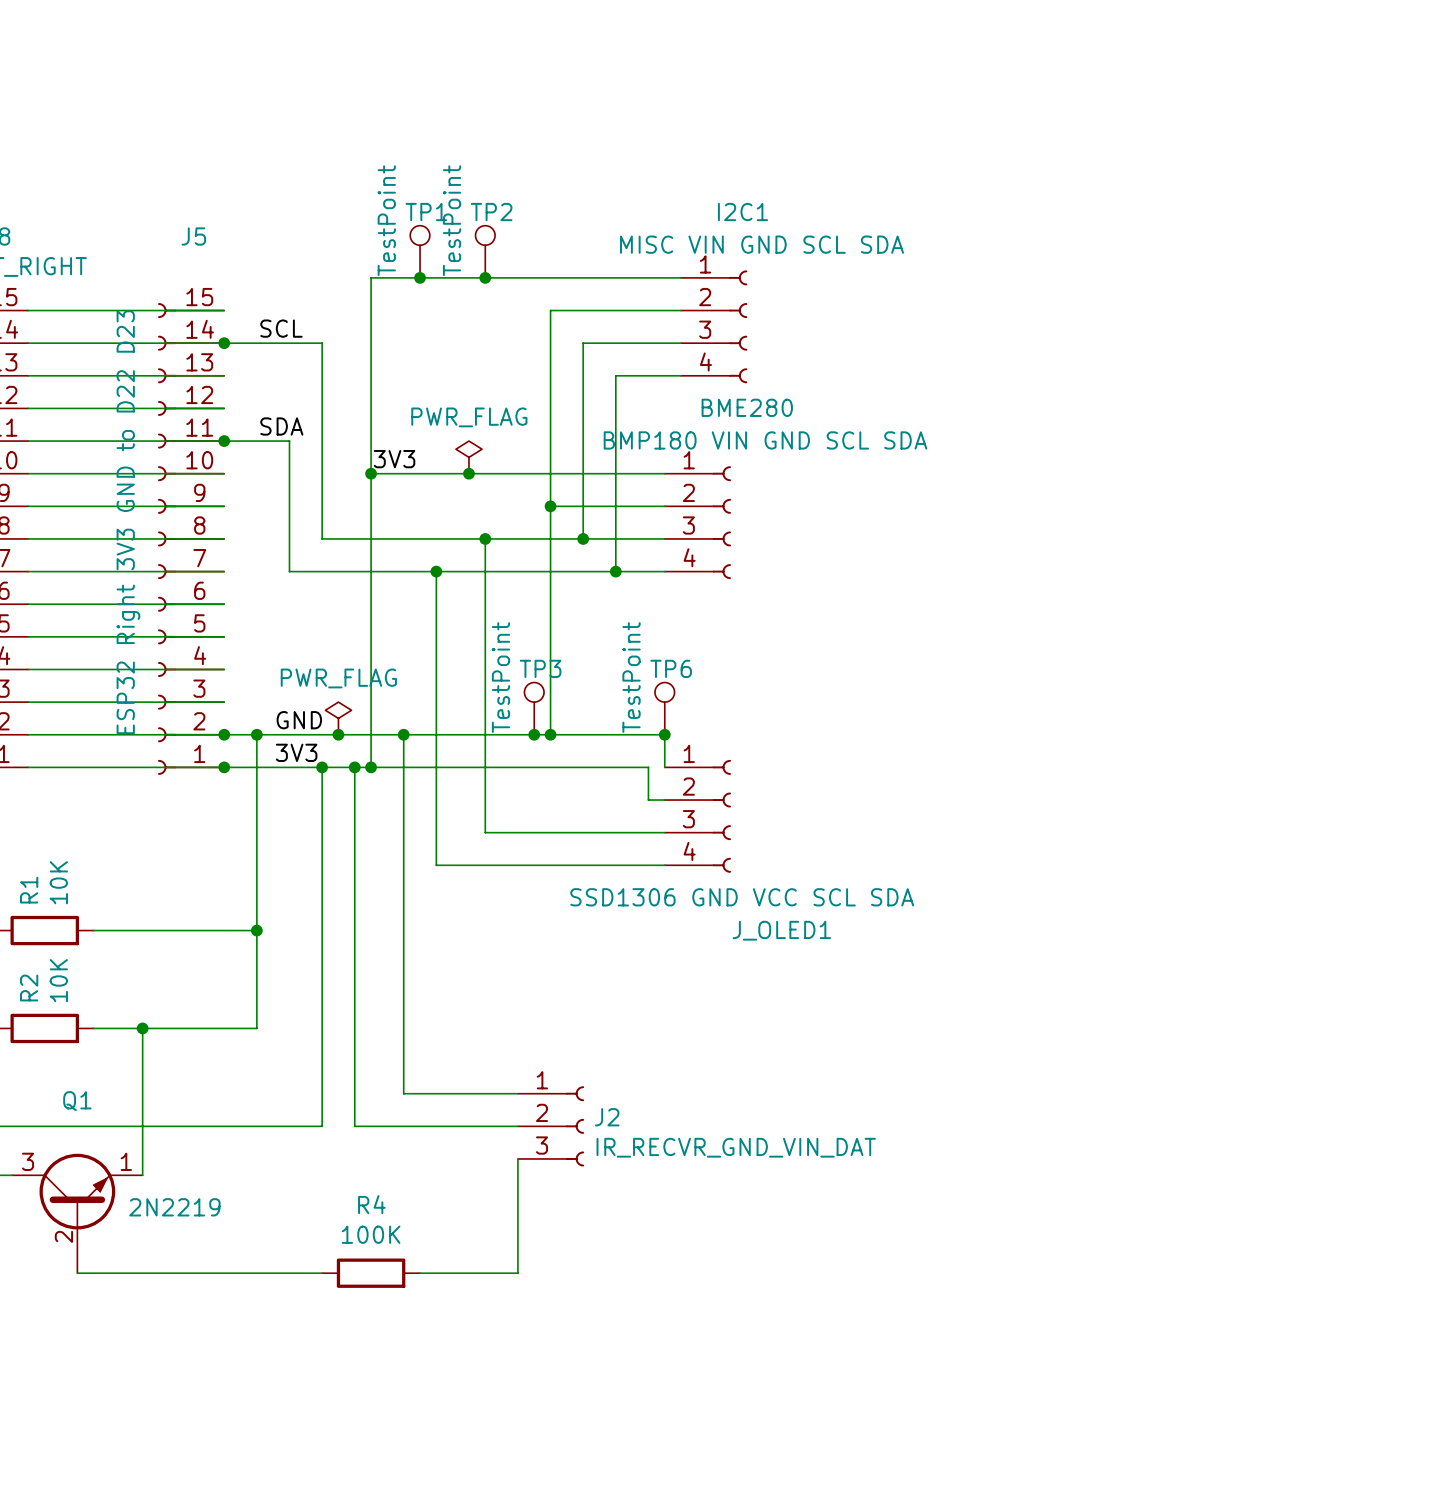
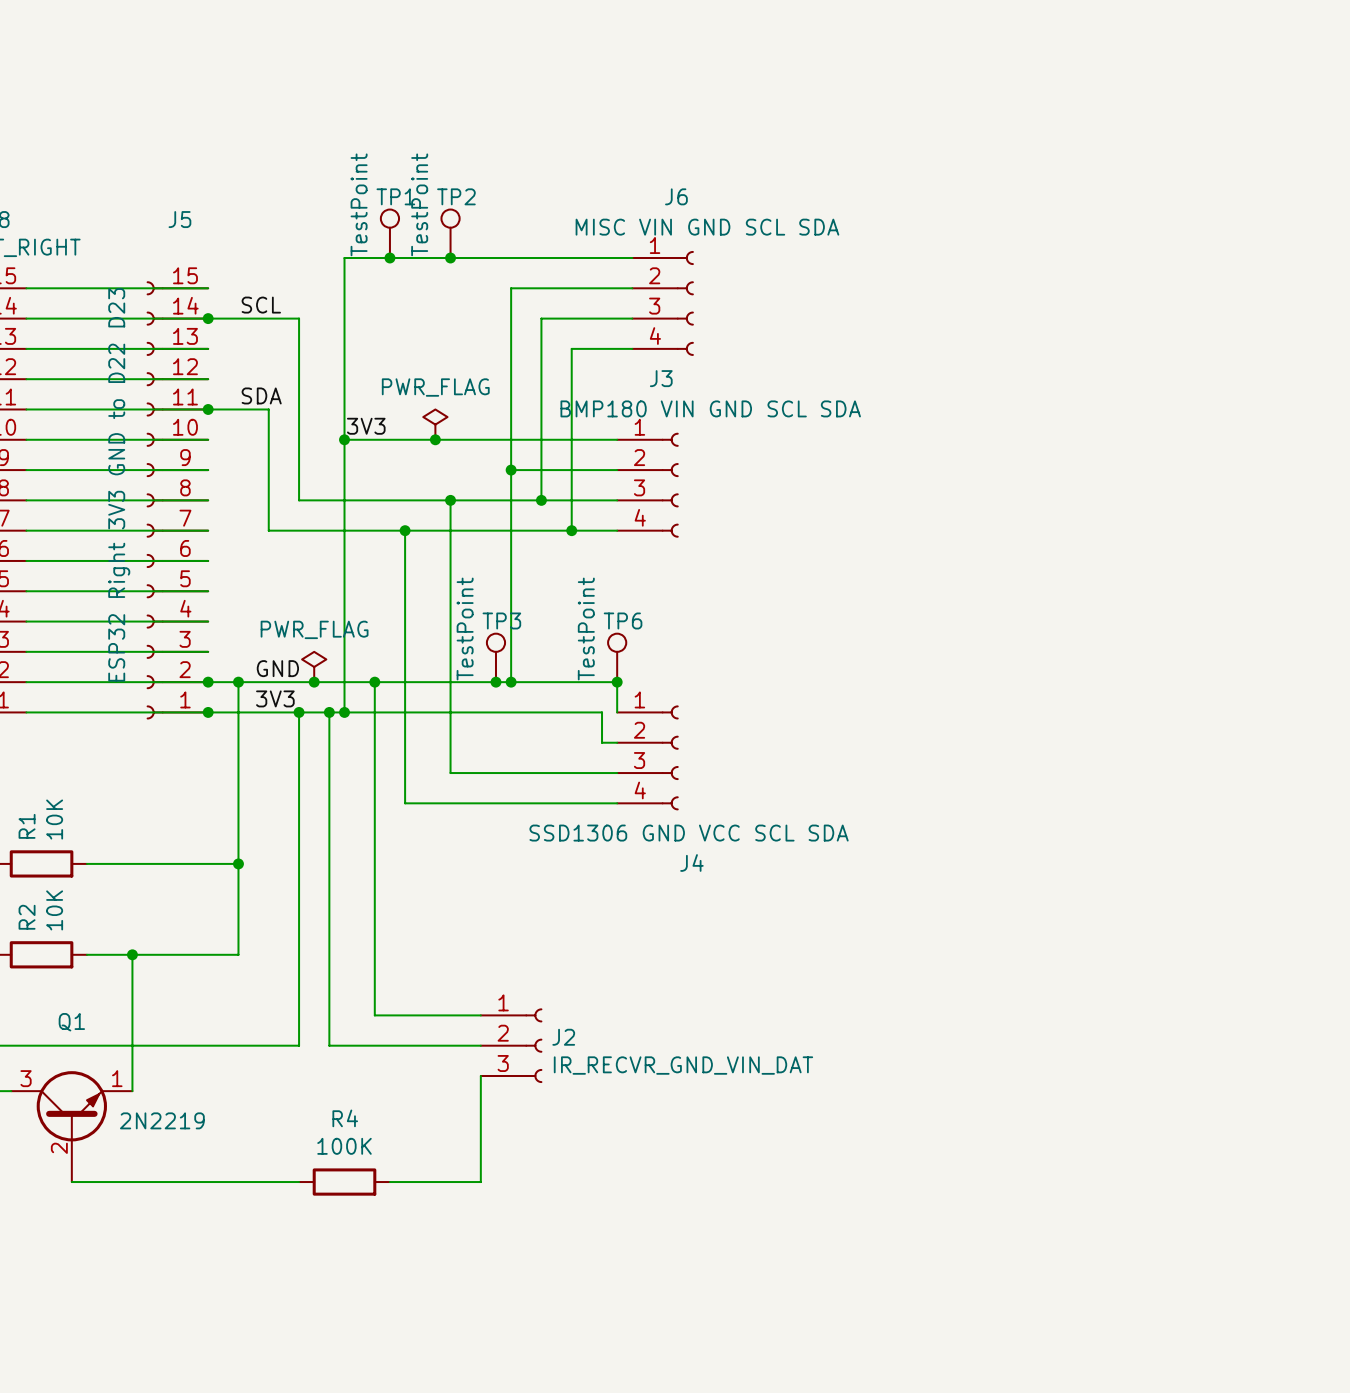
I2C1 name: I2C1 (742, 212) -> J6 (676, 196)
BME280 name: BME280 (747, 407) -> J3 (661, 378)
J_OLED1 name: J_OLED1 (781, 930) -> J4 (691, 862)

